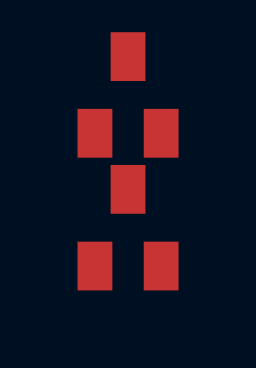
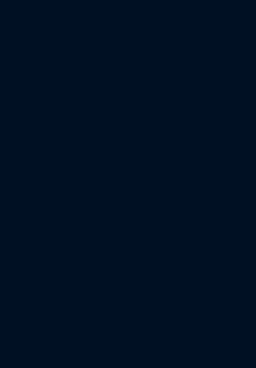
part: (128, 94) -> none
part: (128, 227) -> none

